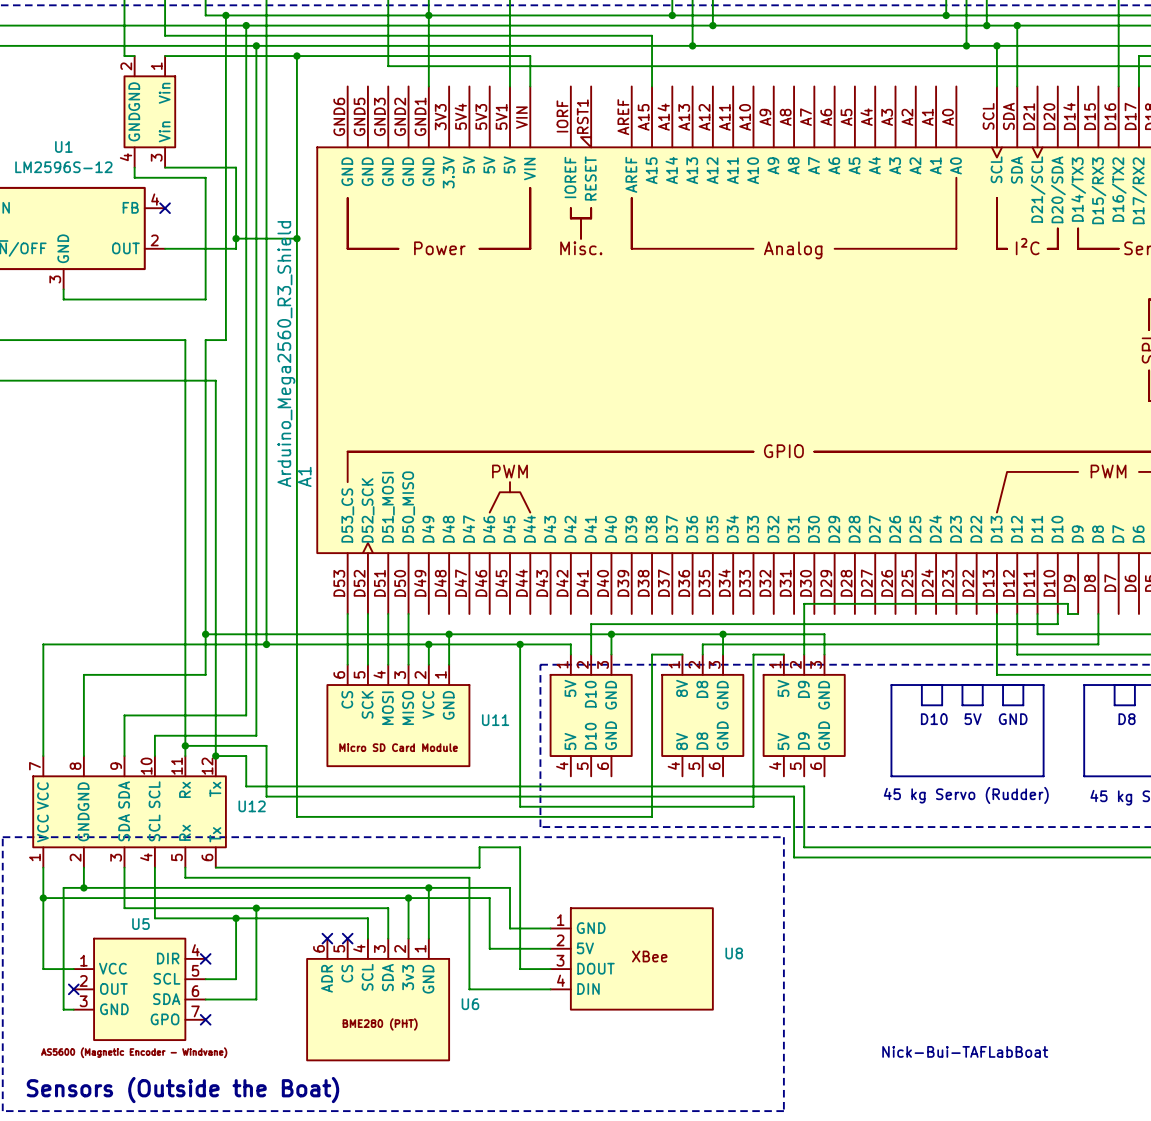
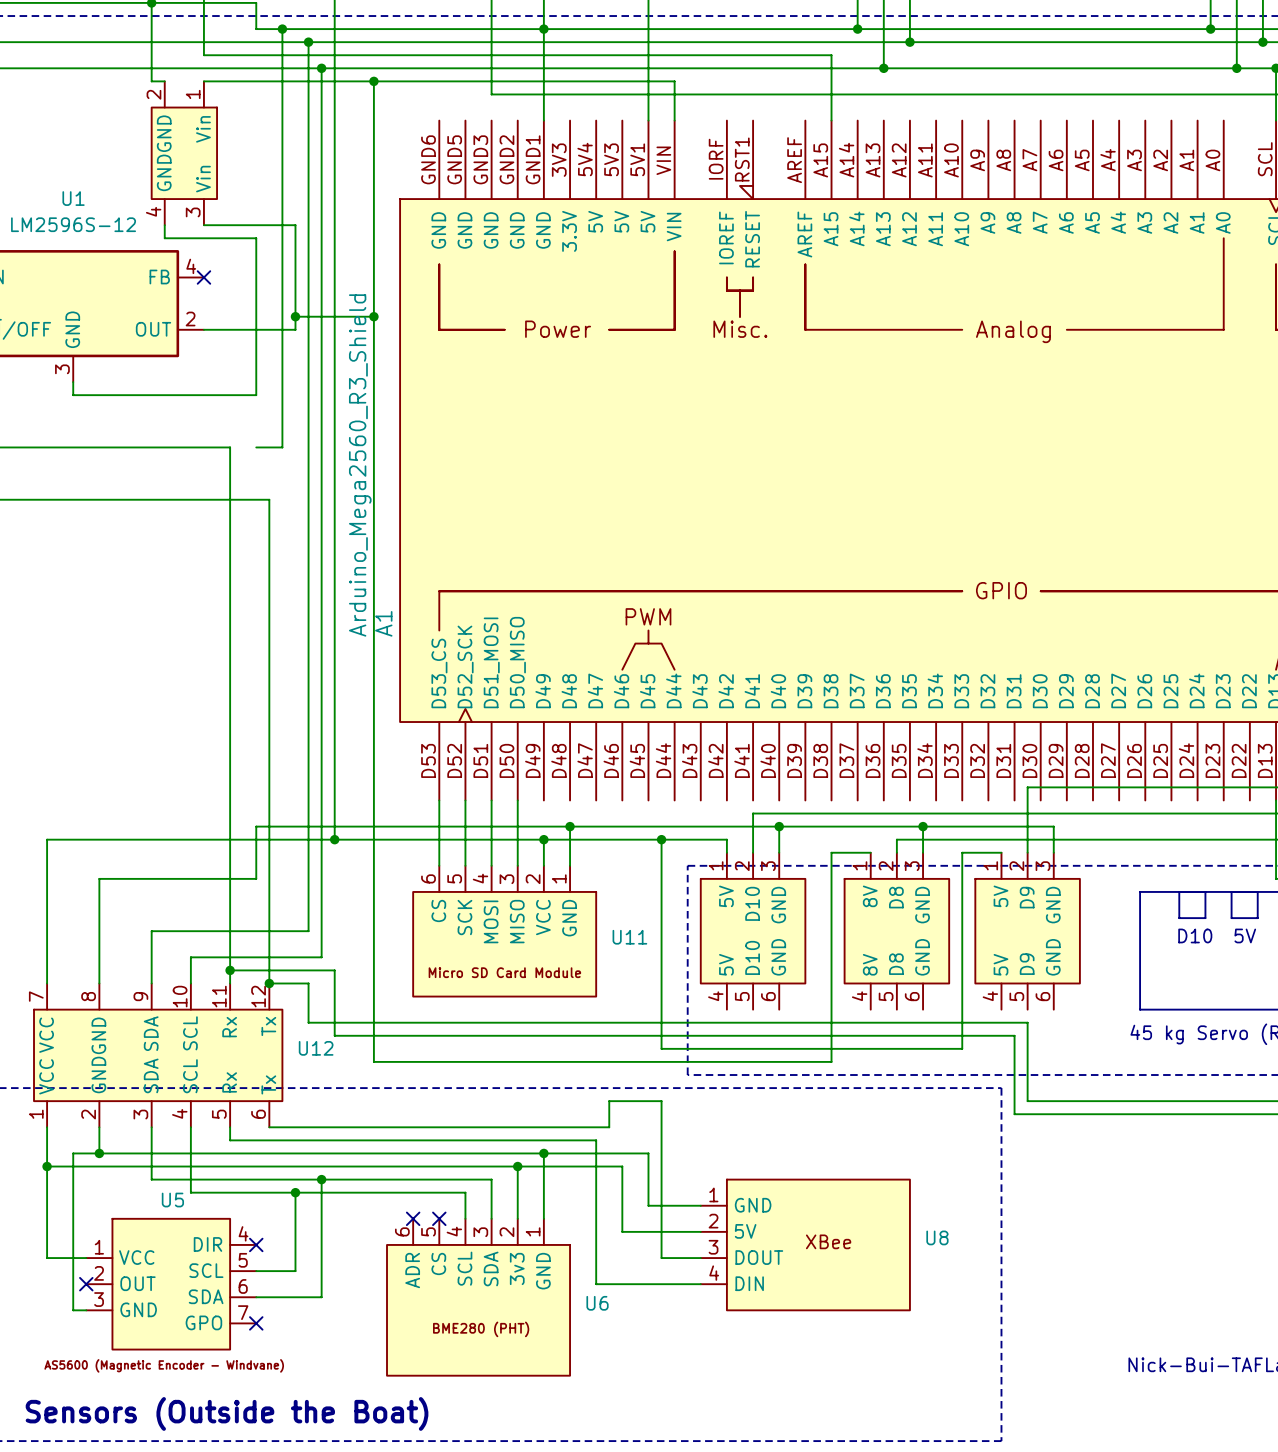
wire: (205, 340) (205, 634) -> none
junction: (205, 634) -> none

